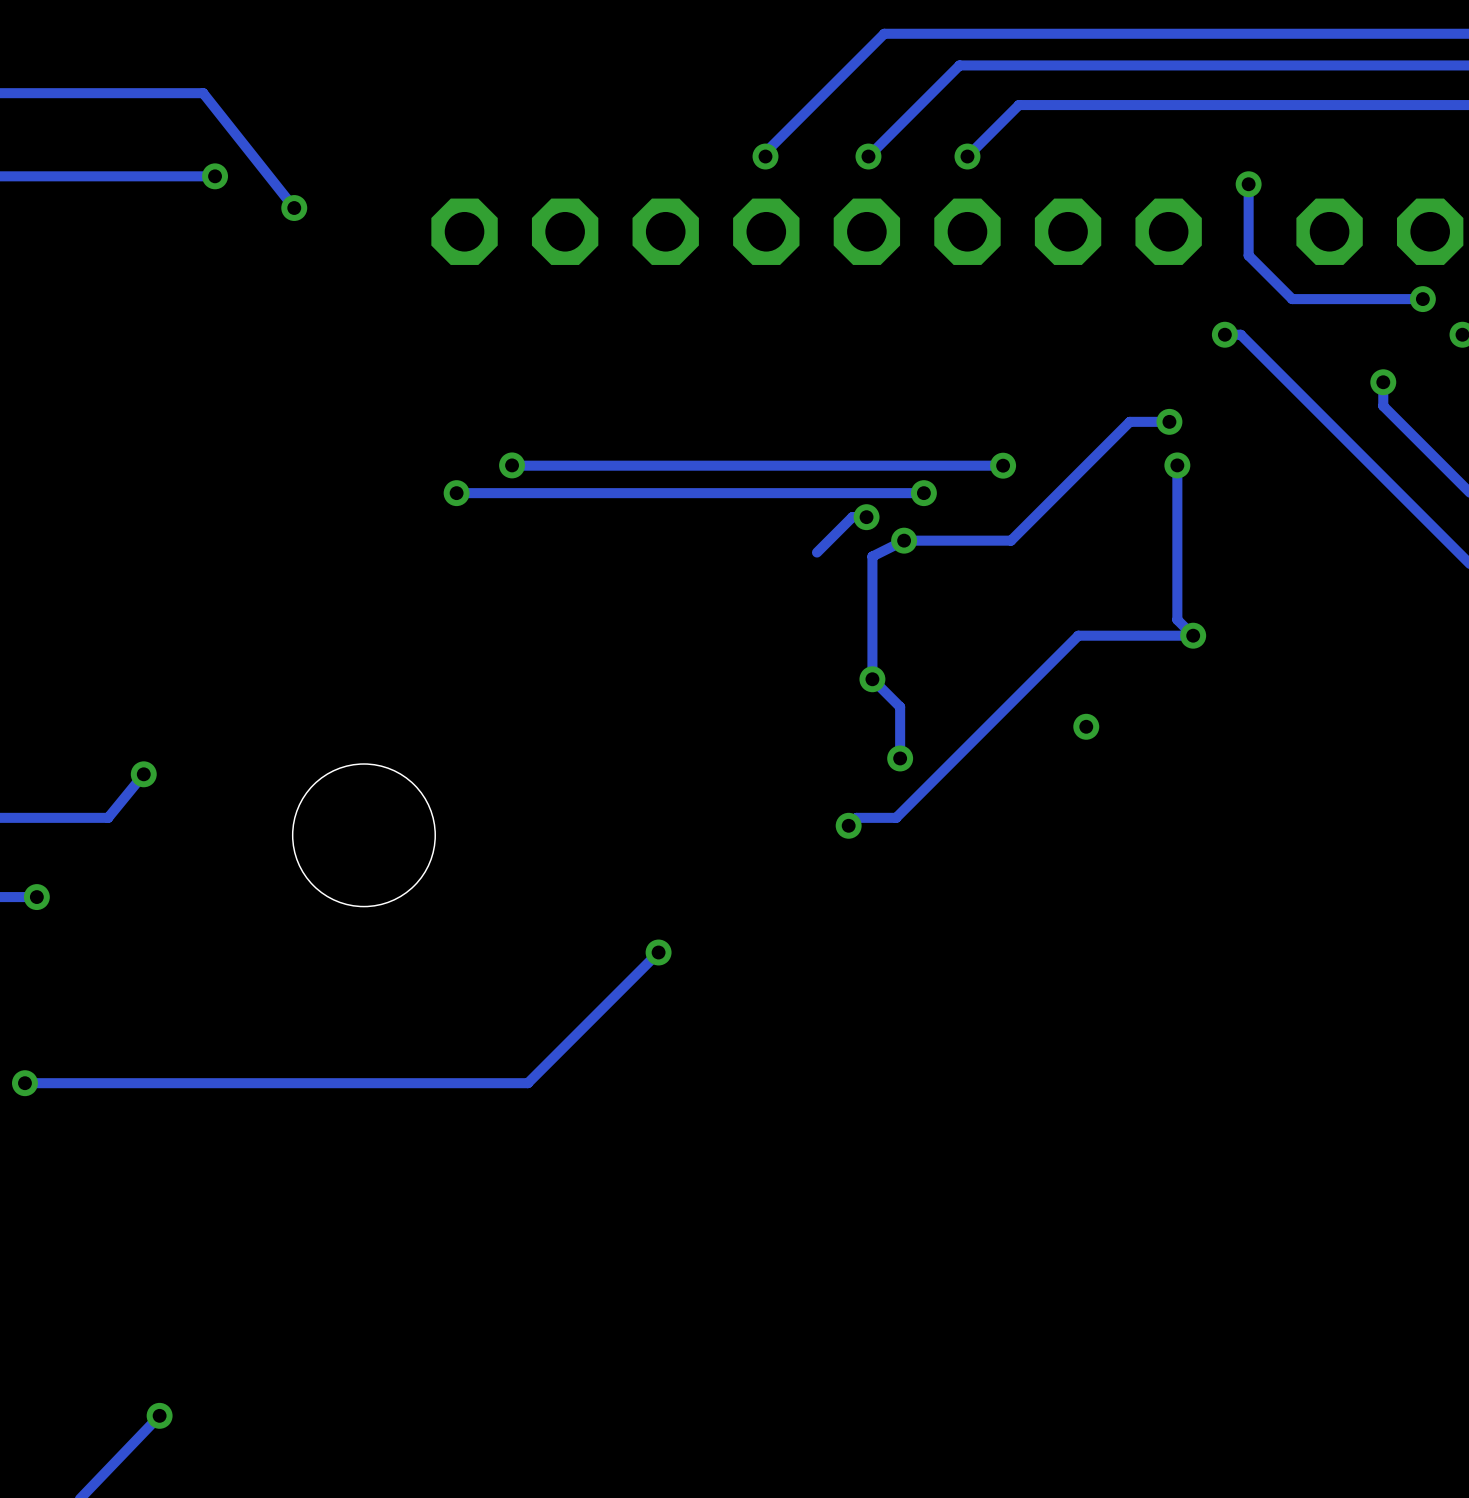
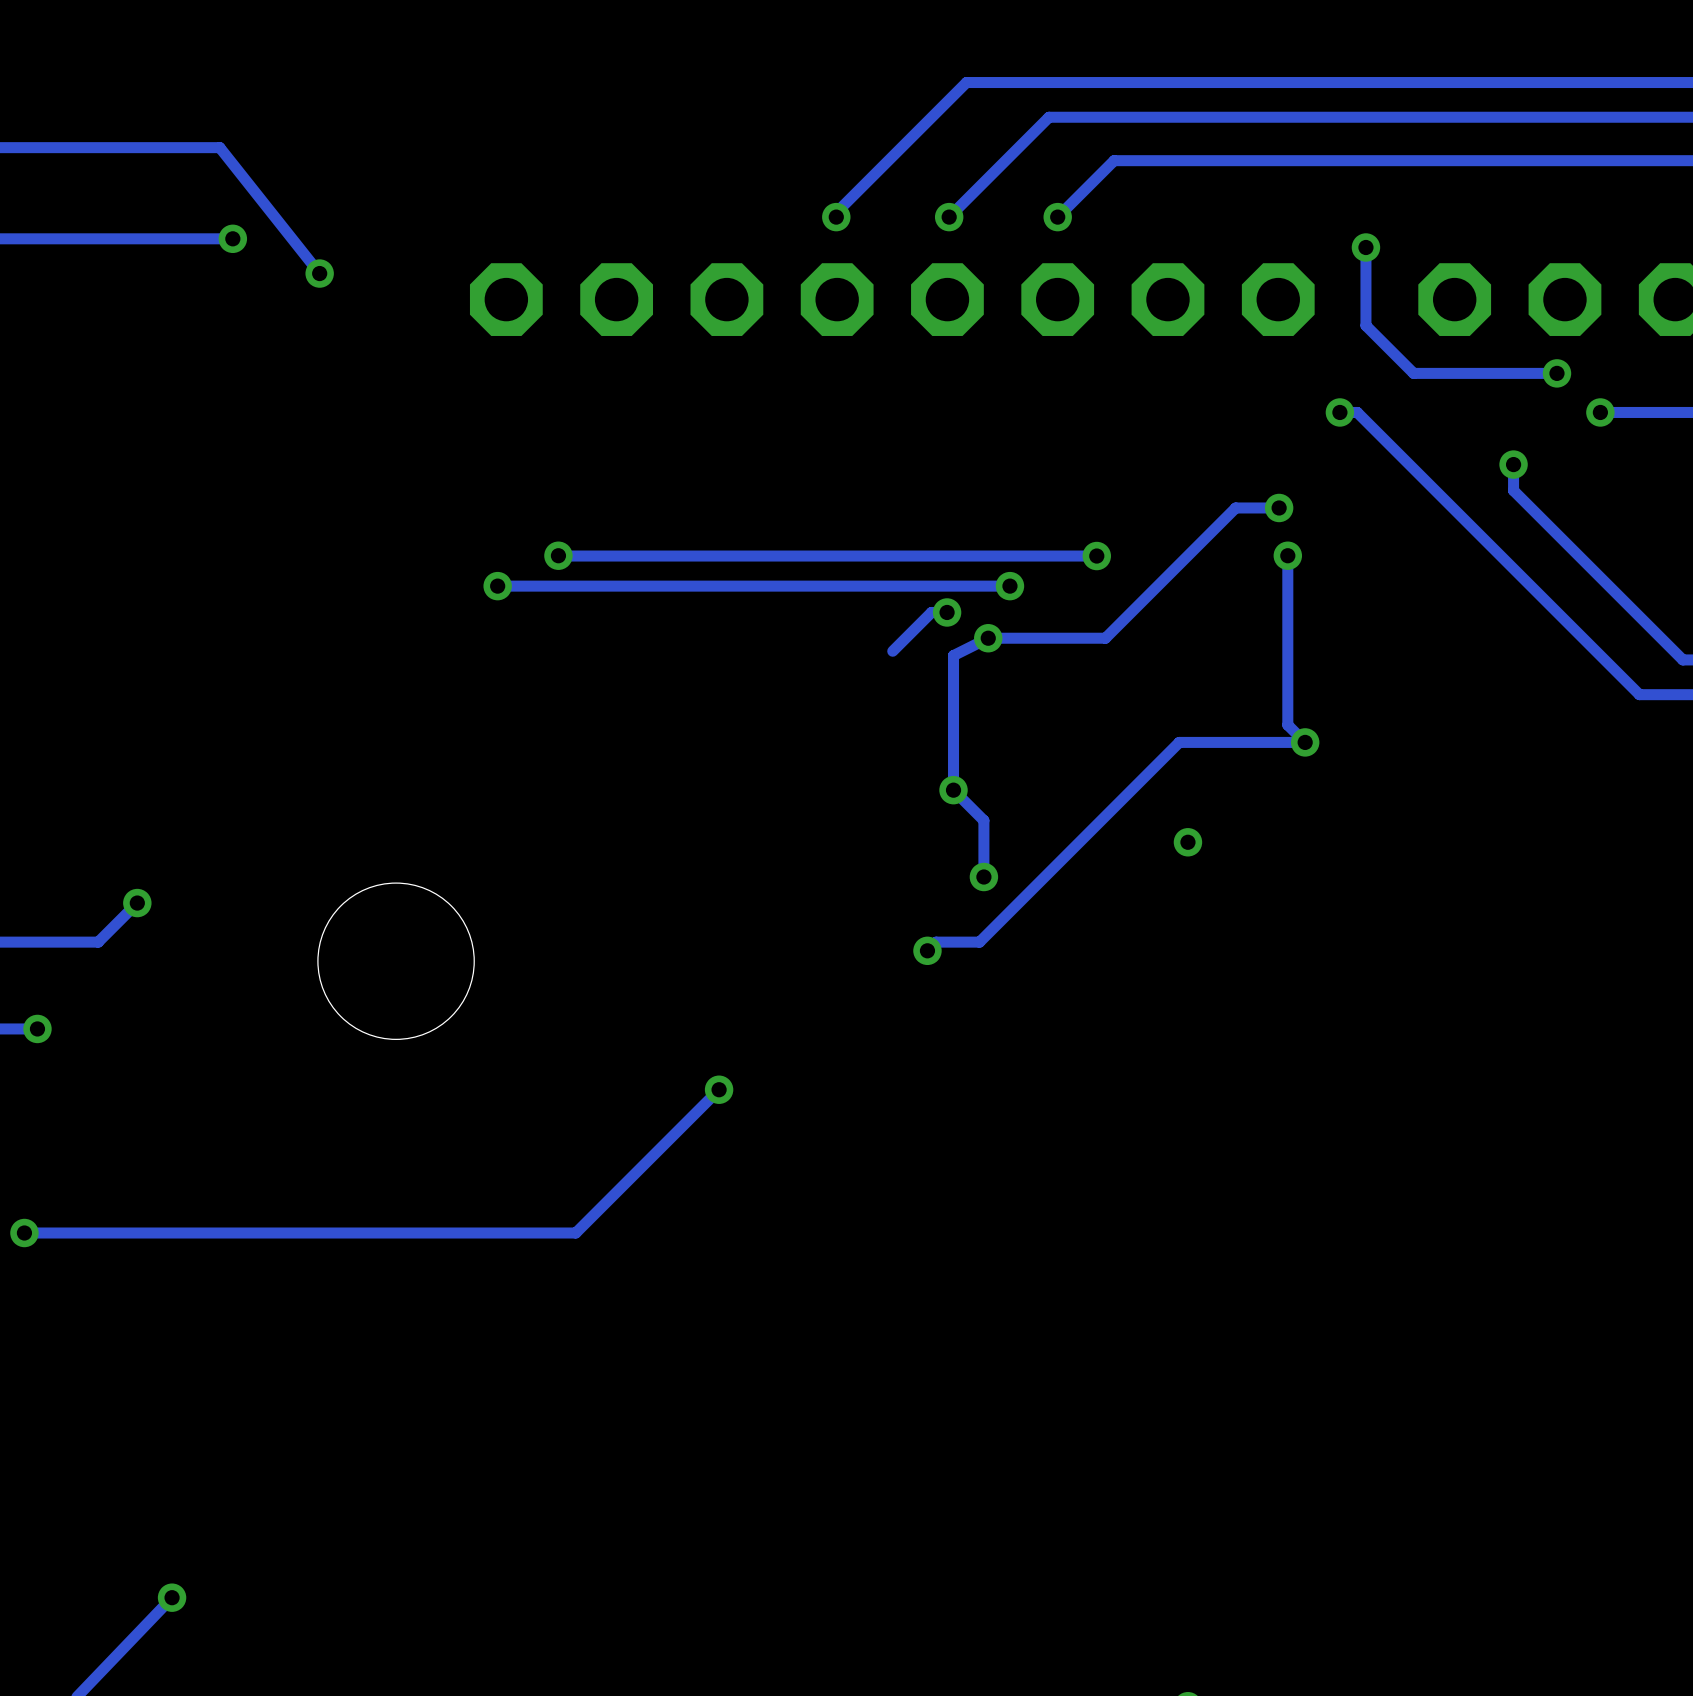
track: (143, 774) (108, 817) (92, 817) -> (137, 903) (98, 942)
via position: (143, 774) -> (137, 903)

